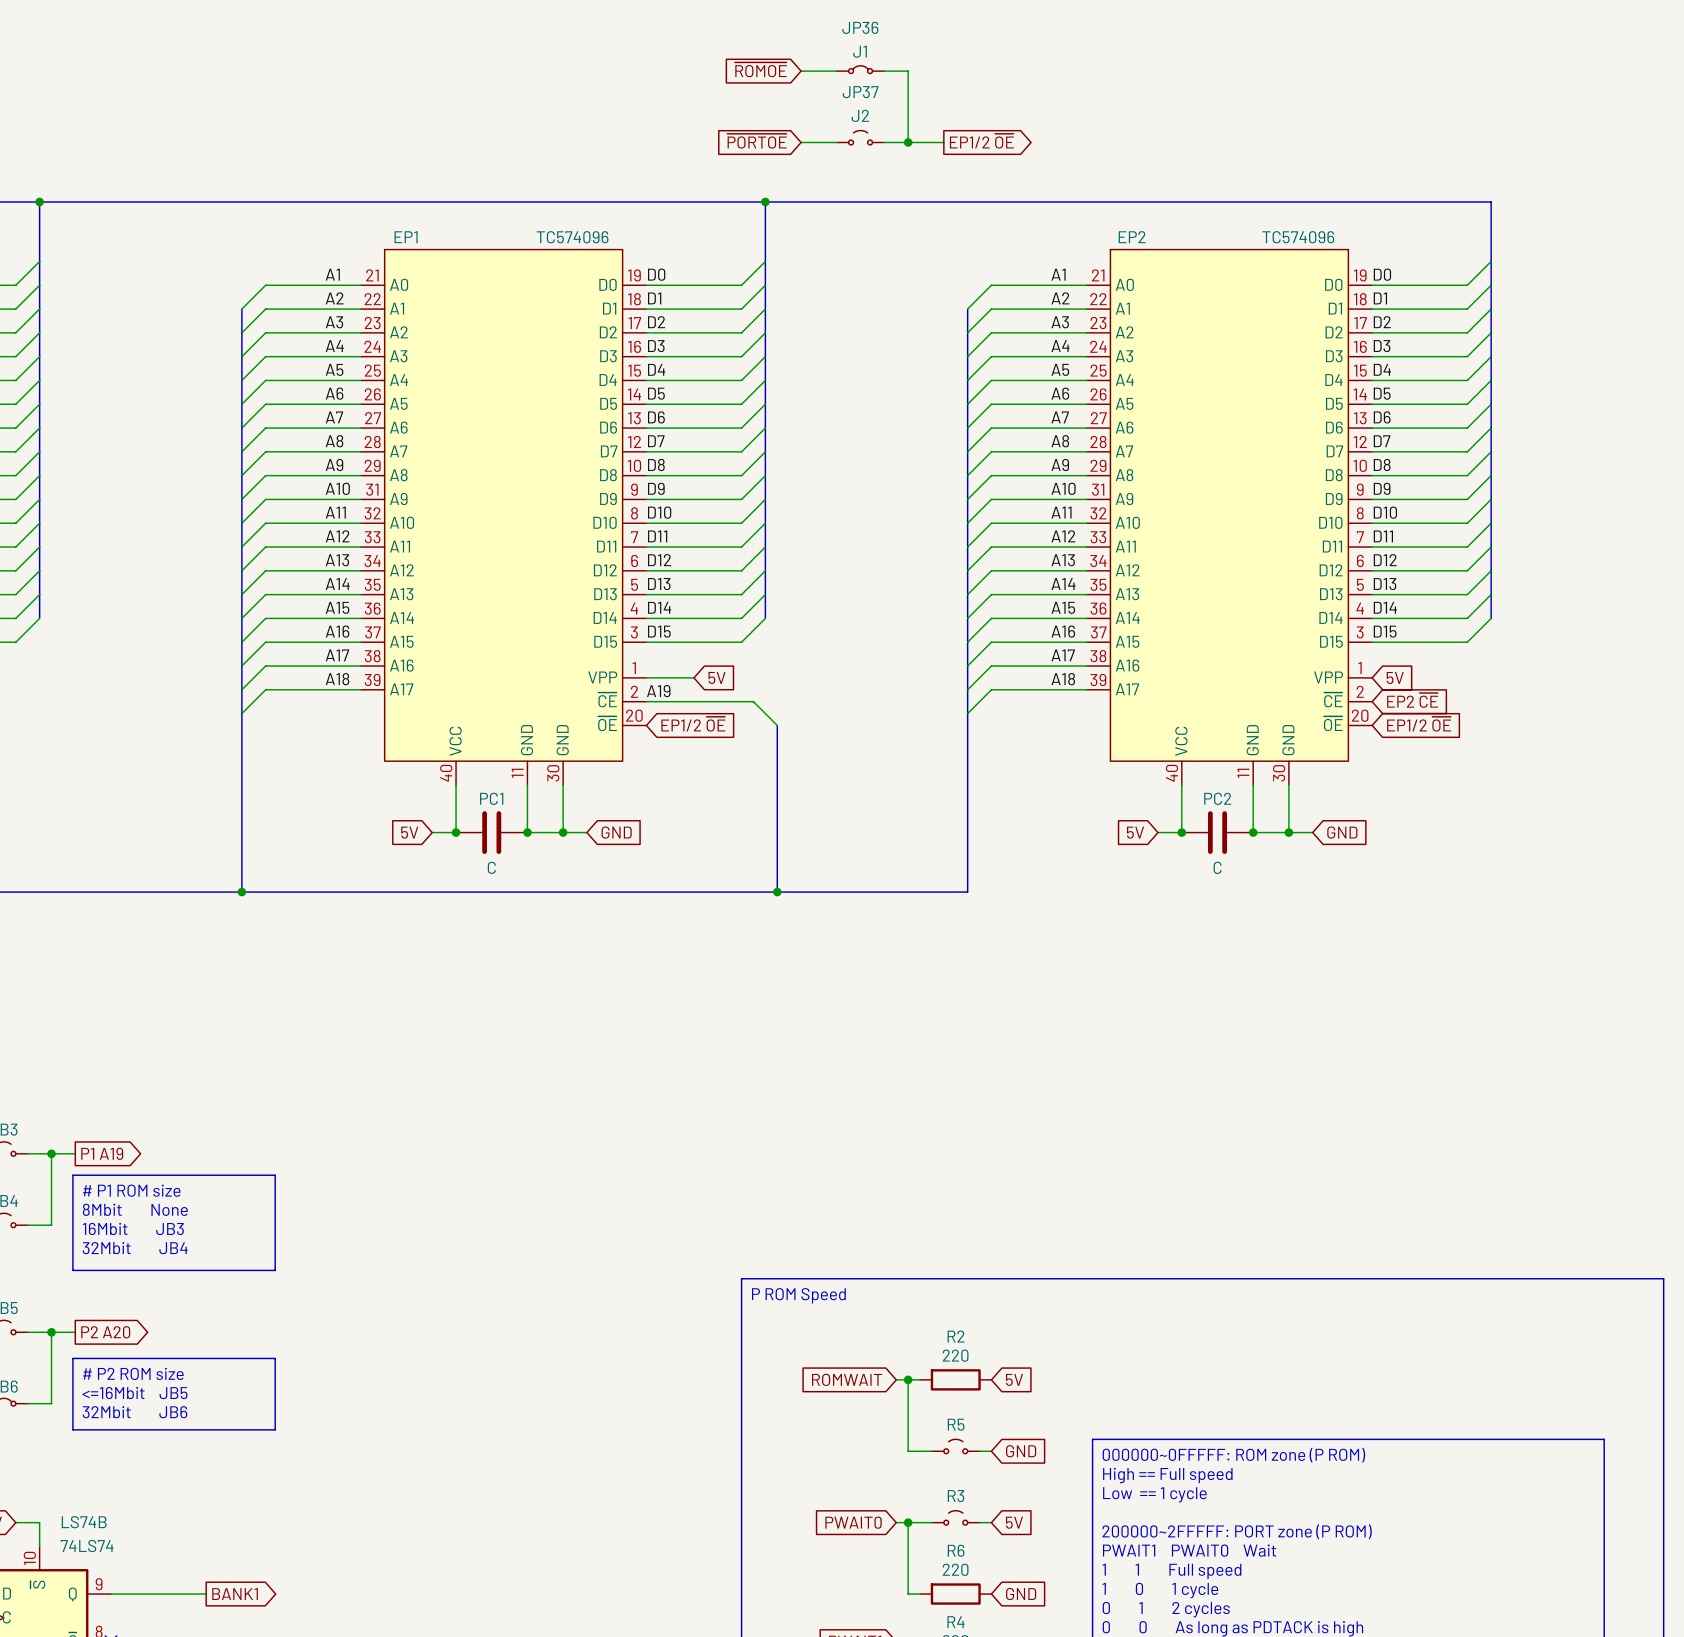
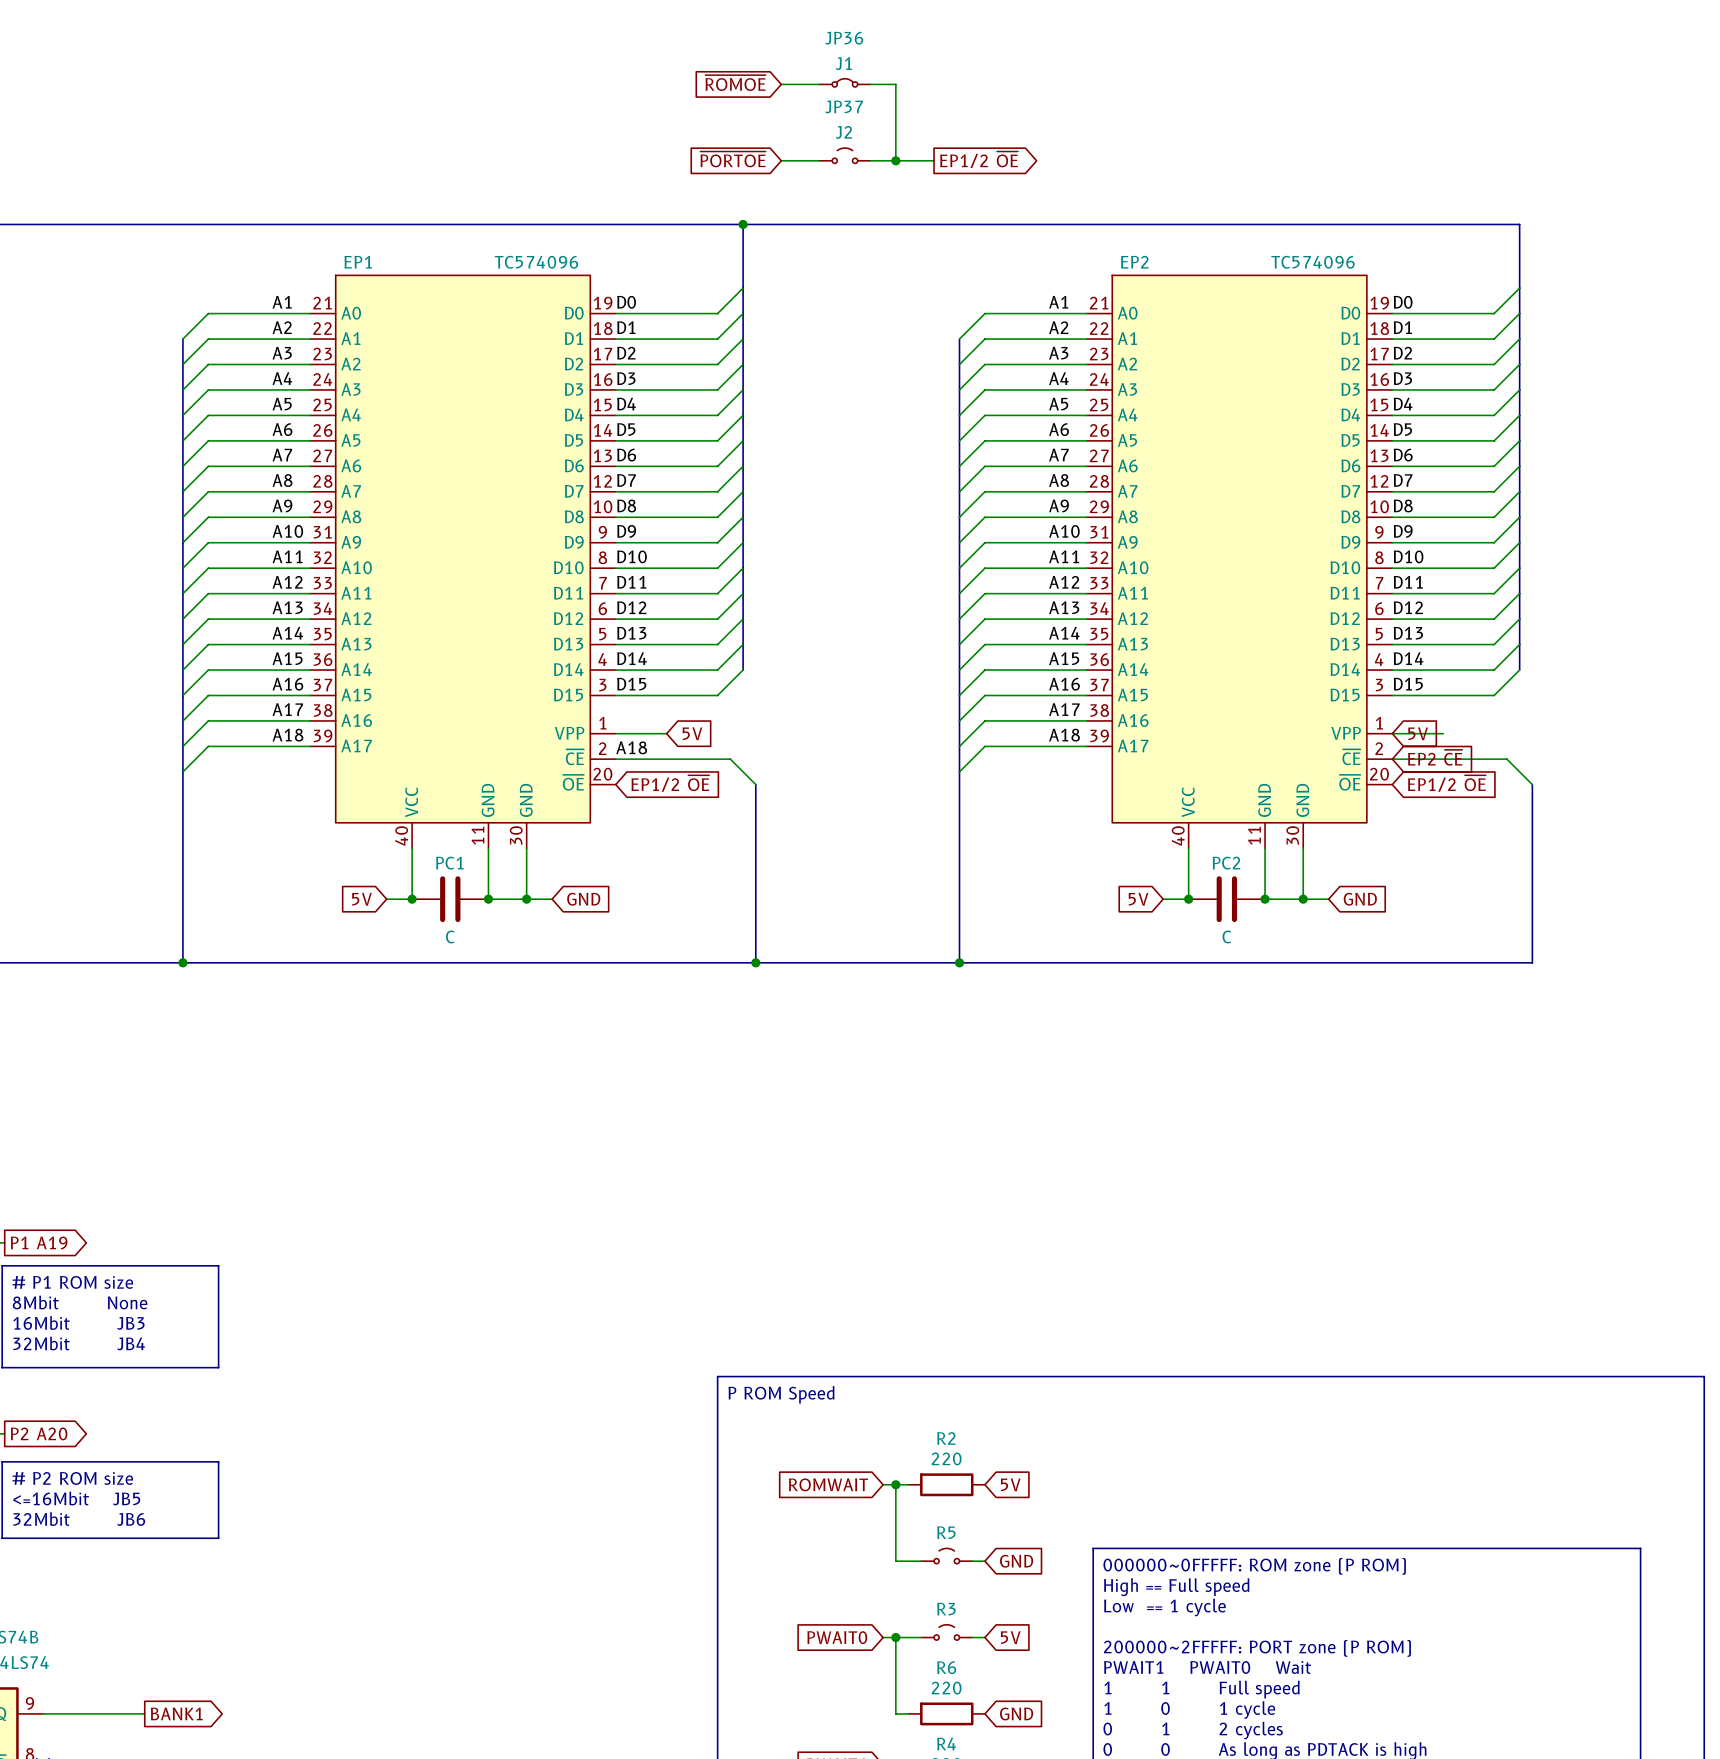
wire: none -> (1392, 733) (1443, 733)
label: A19 (658, 691) -> A18 (631, 747)
wire: none -> (1392, 759) (1506, 759) (1532, 784)
bus: none -> (1532, 784) (1532, 962) (959, 962)
junction: none -> (959, 962)

